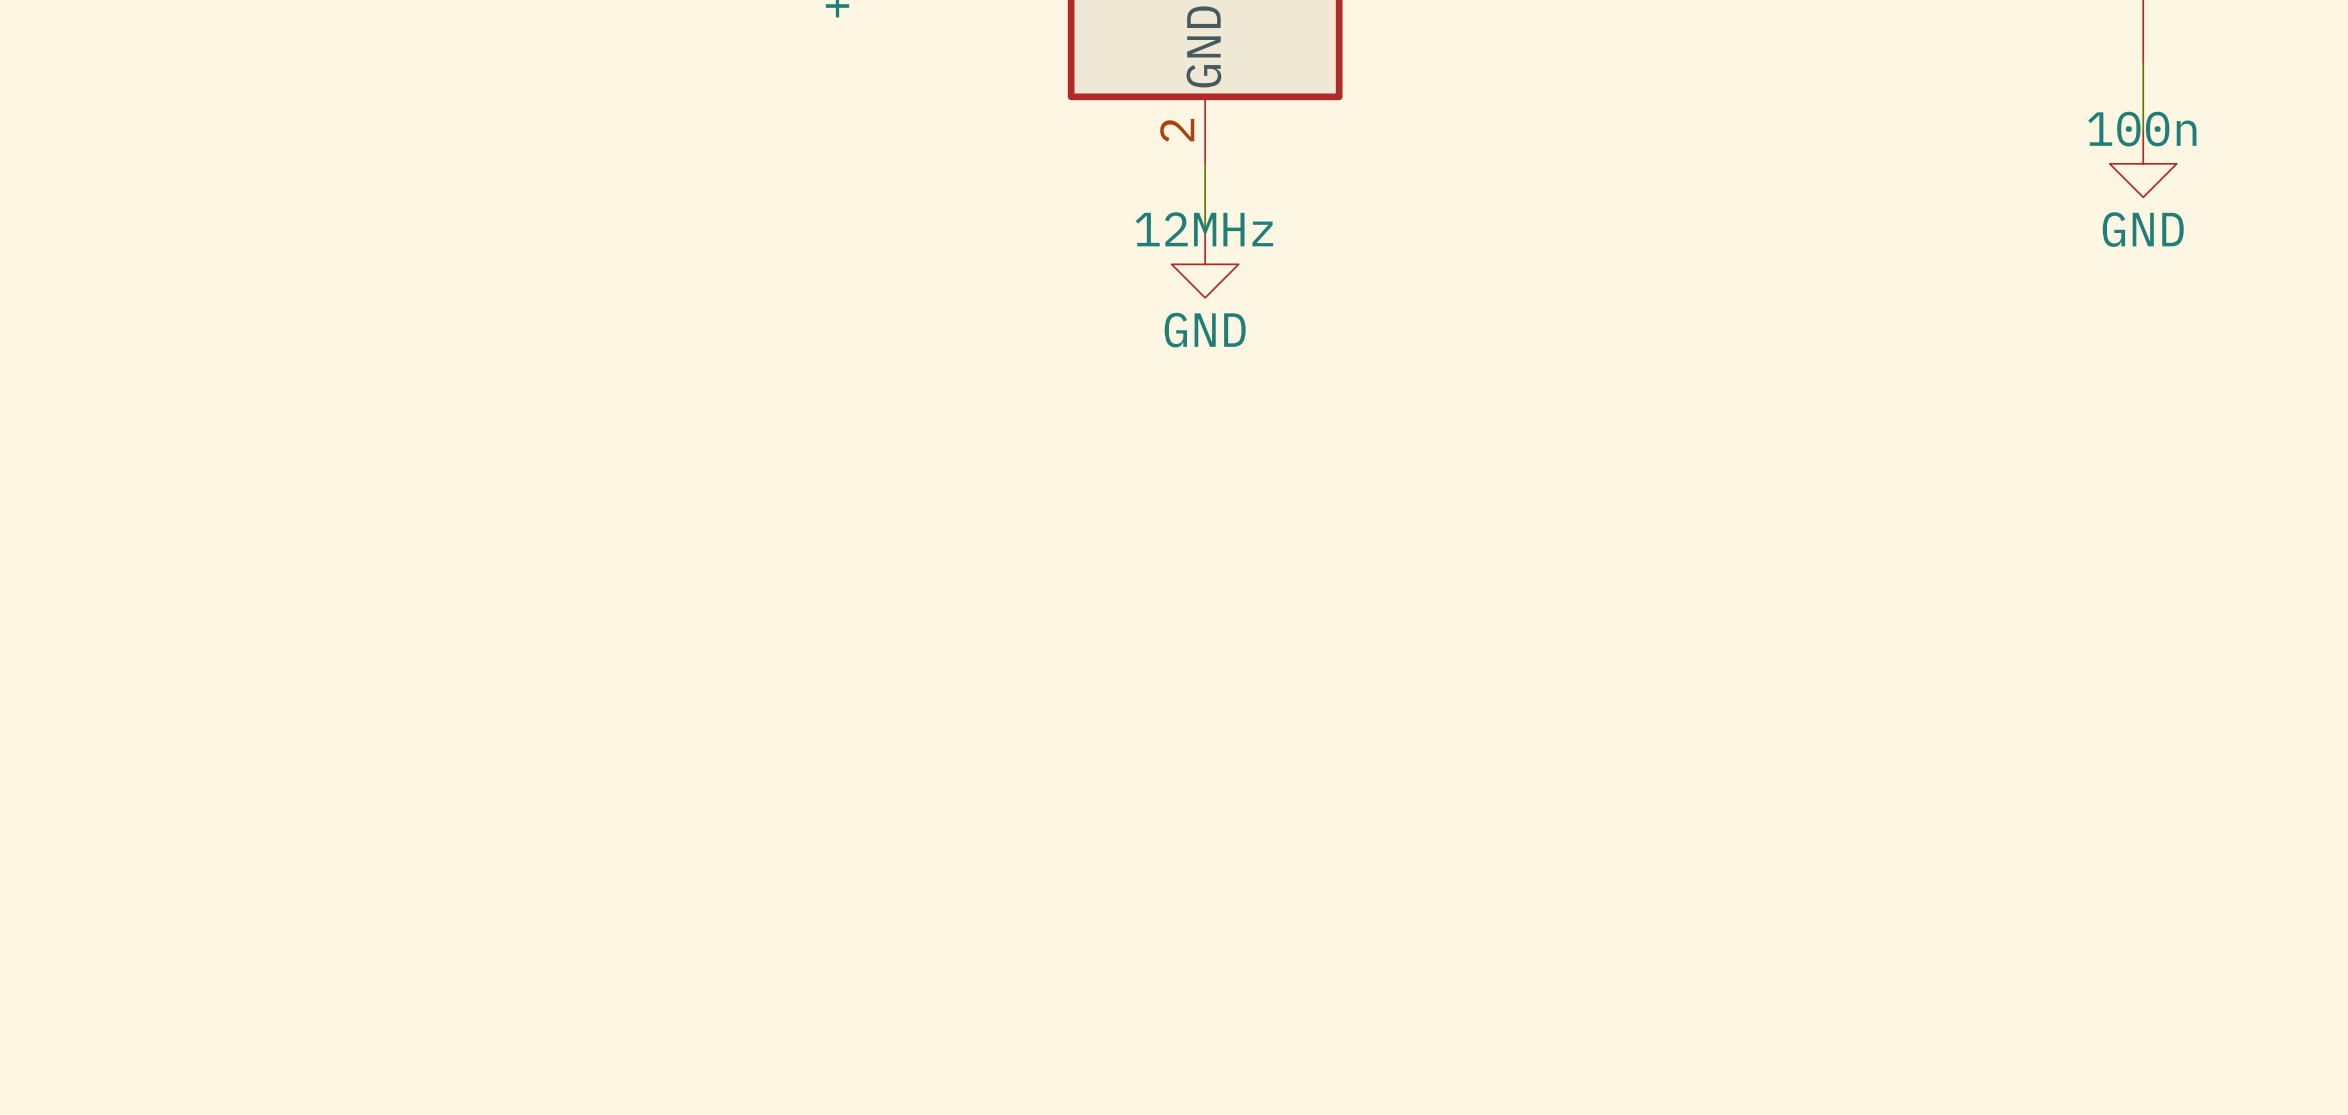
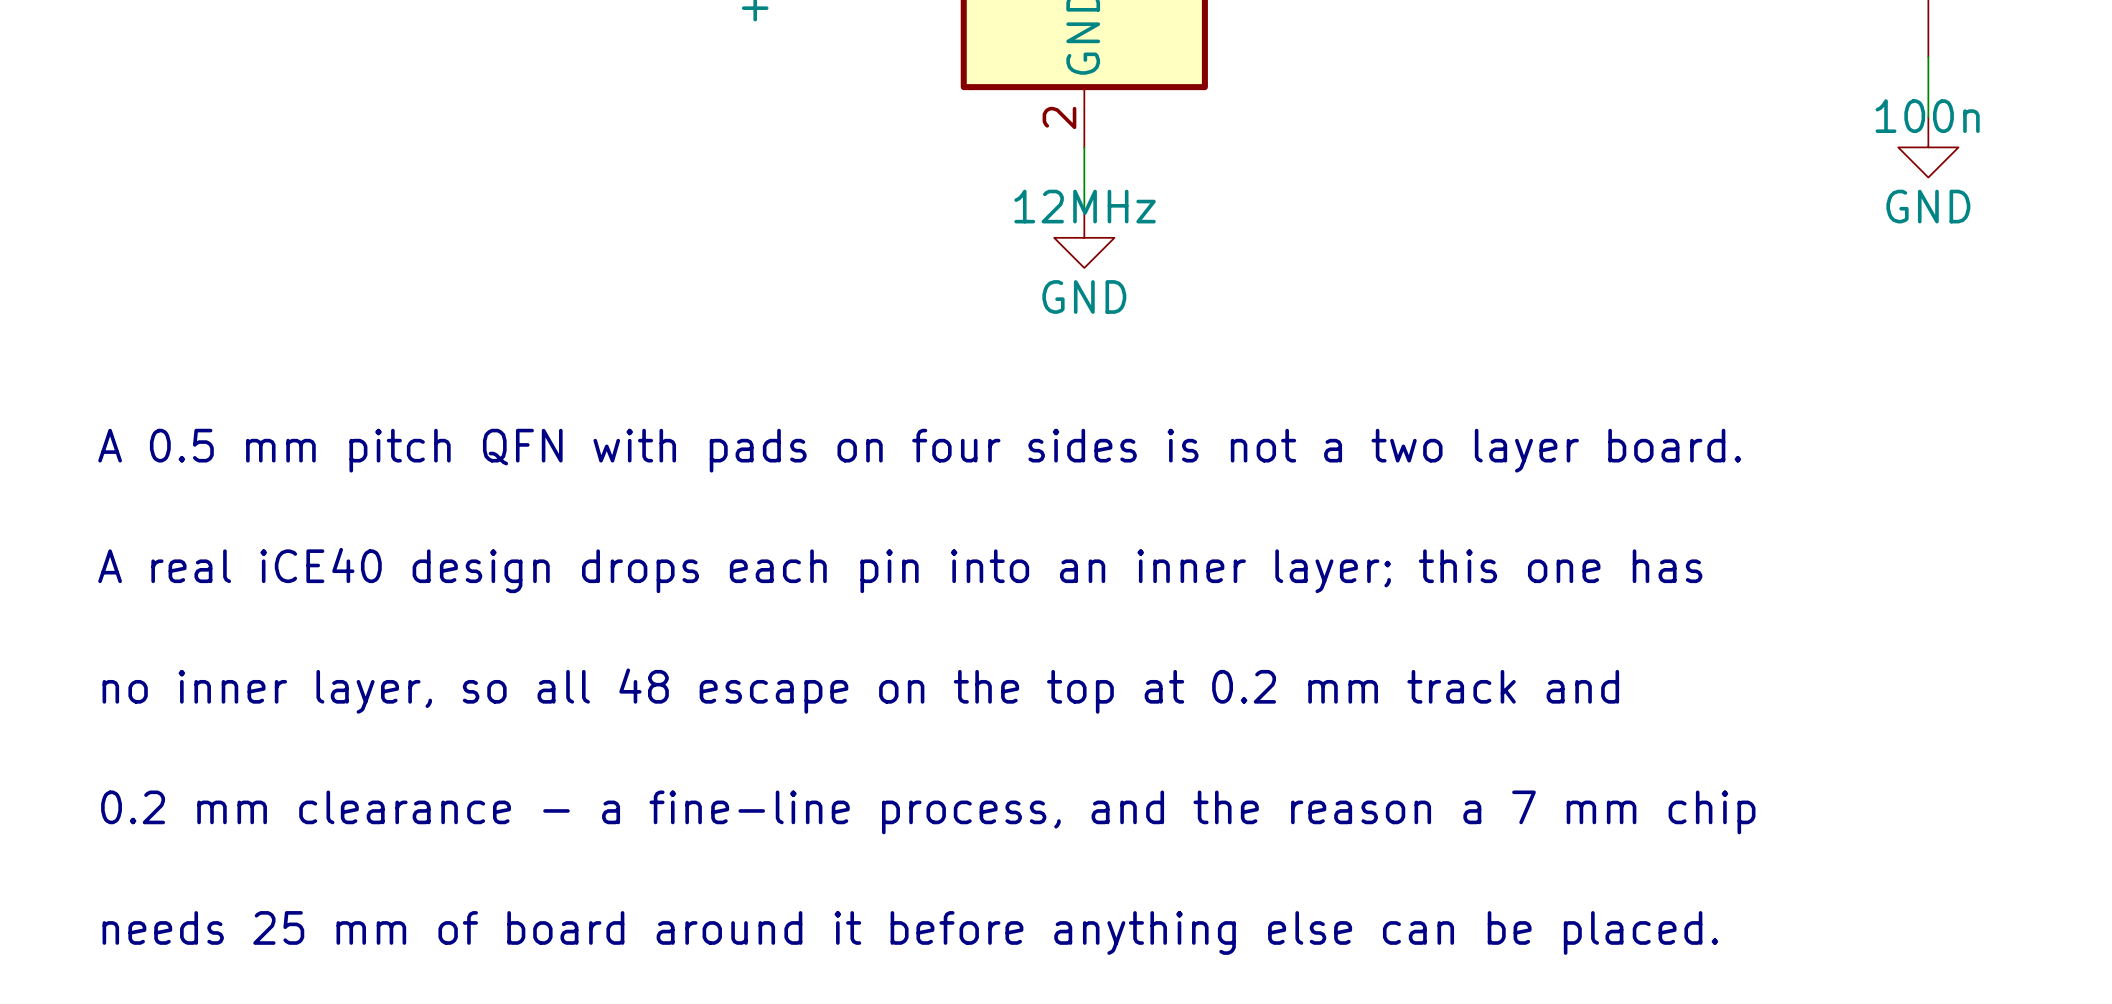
text: none -> A 0.5 mm pitch QFN with pads on four sides is not a two layer board. (919, 450)
text: none -> A real iCE40 design drops each pin into an inner layer; this one has (900, 570)
text: none -> no inner layer, so all 48 escape on the top at 0.2 mm track and (860, 691)
text: none -> 0.2 mm clearance - a fine-line process, and the reason a 7 mm chip (928, 812)
text: none -> needs 25 mm of board around it before anything else can be placed. (910, 932)

